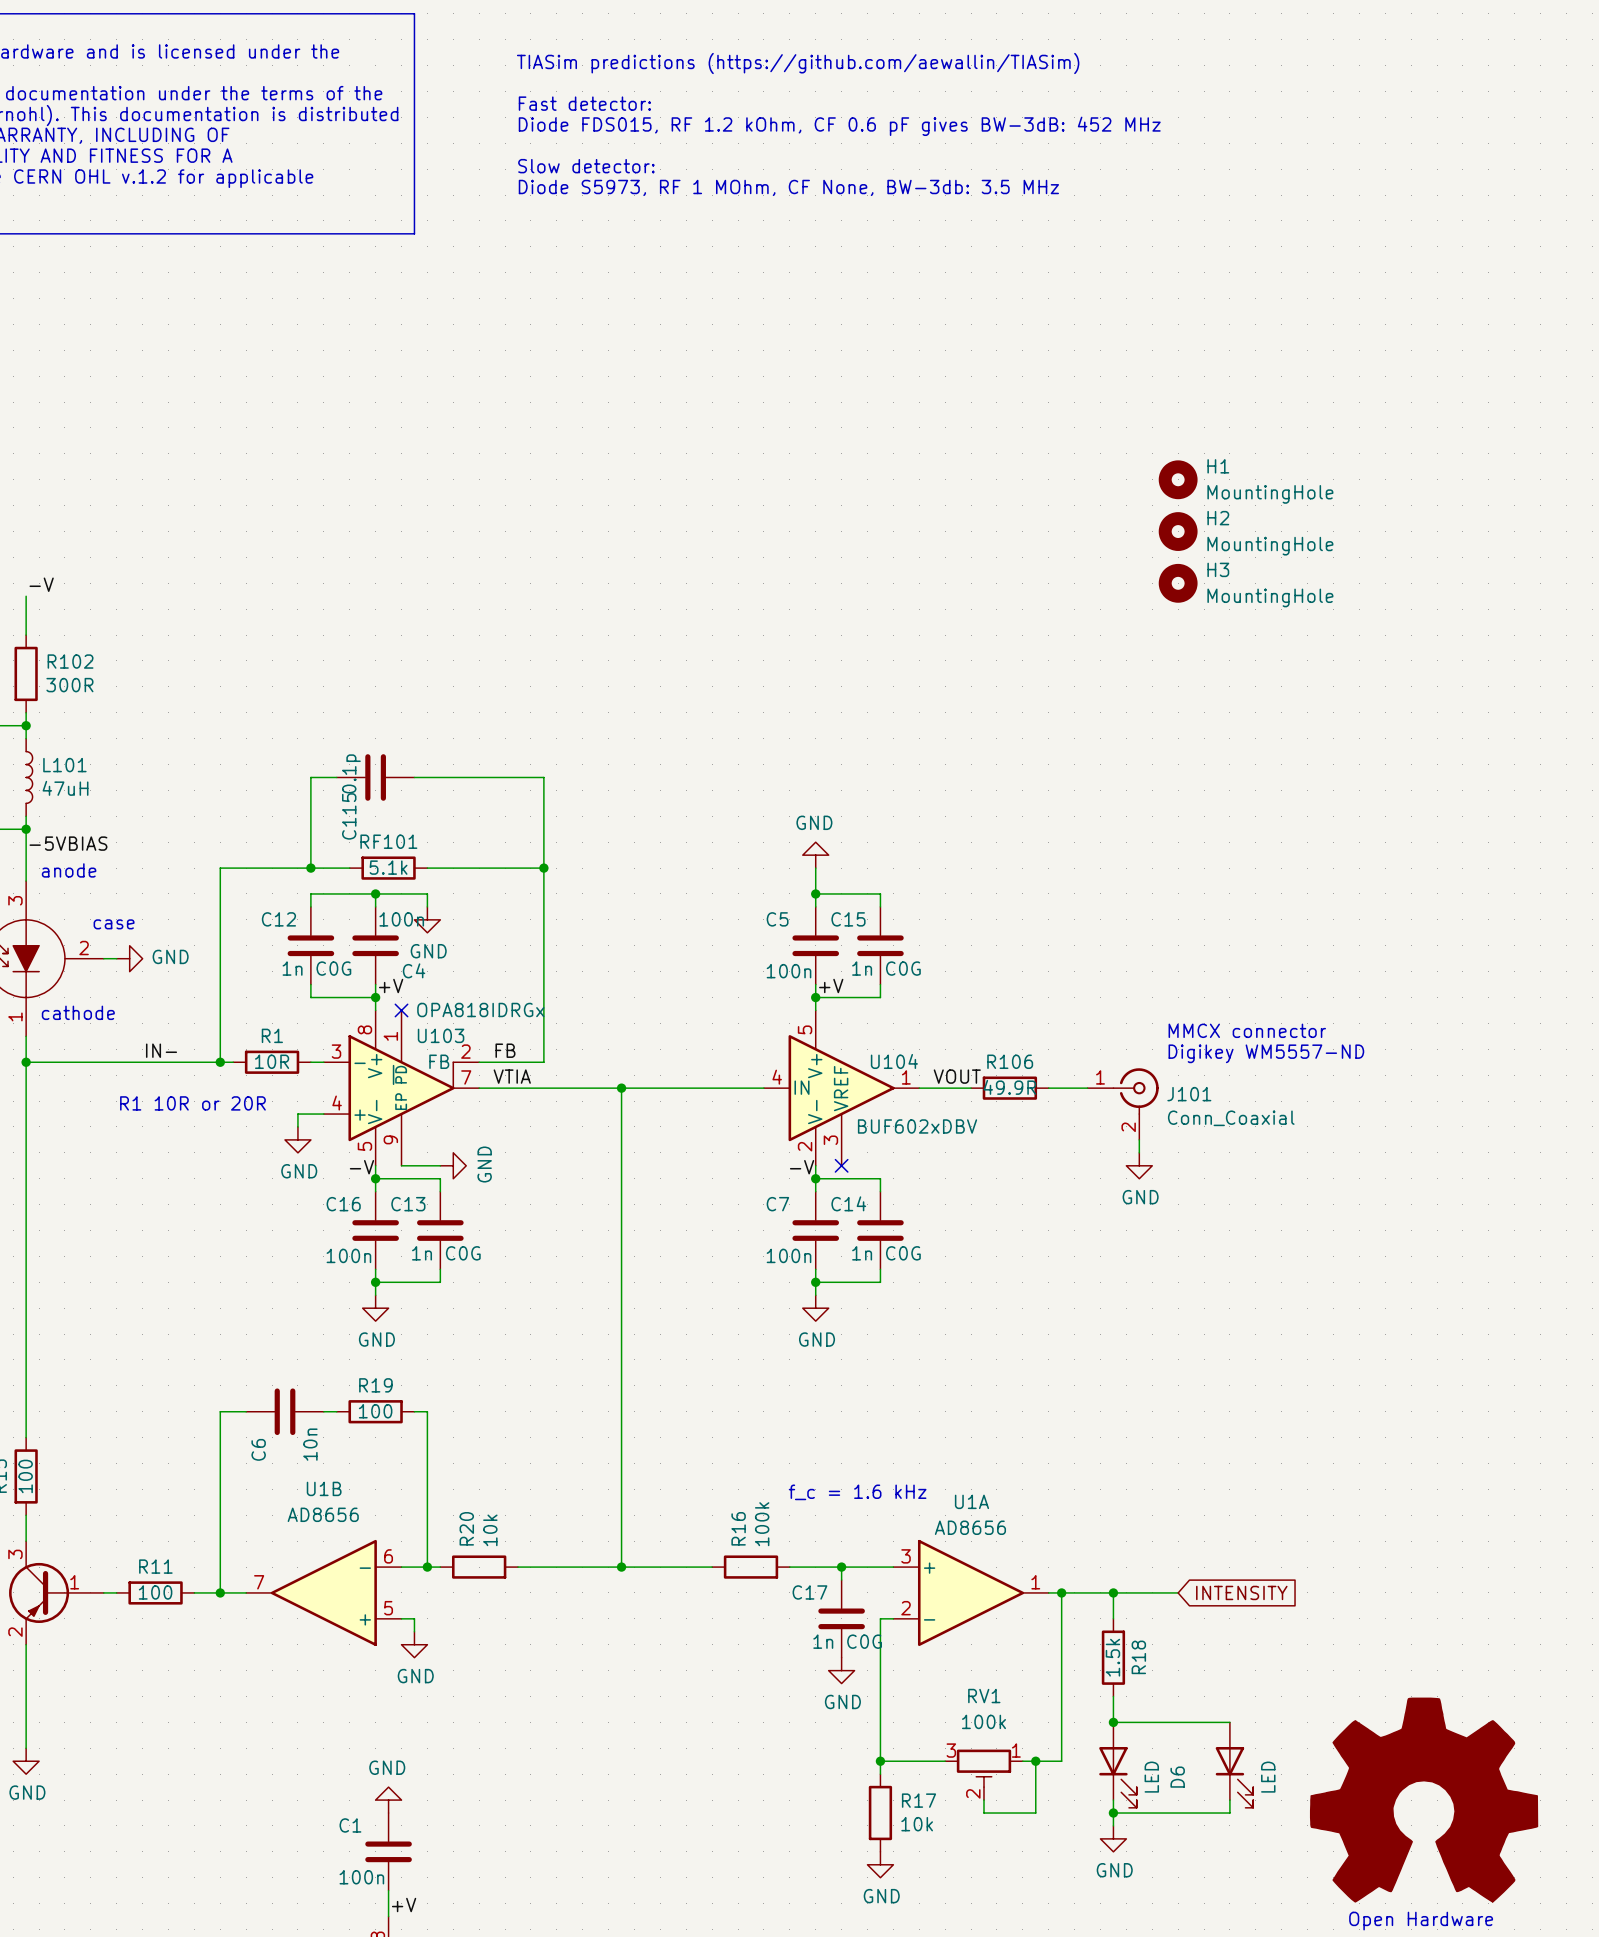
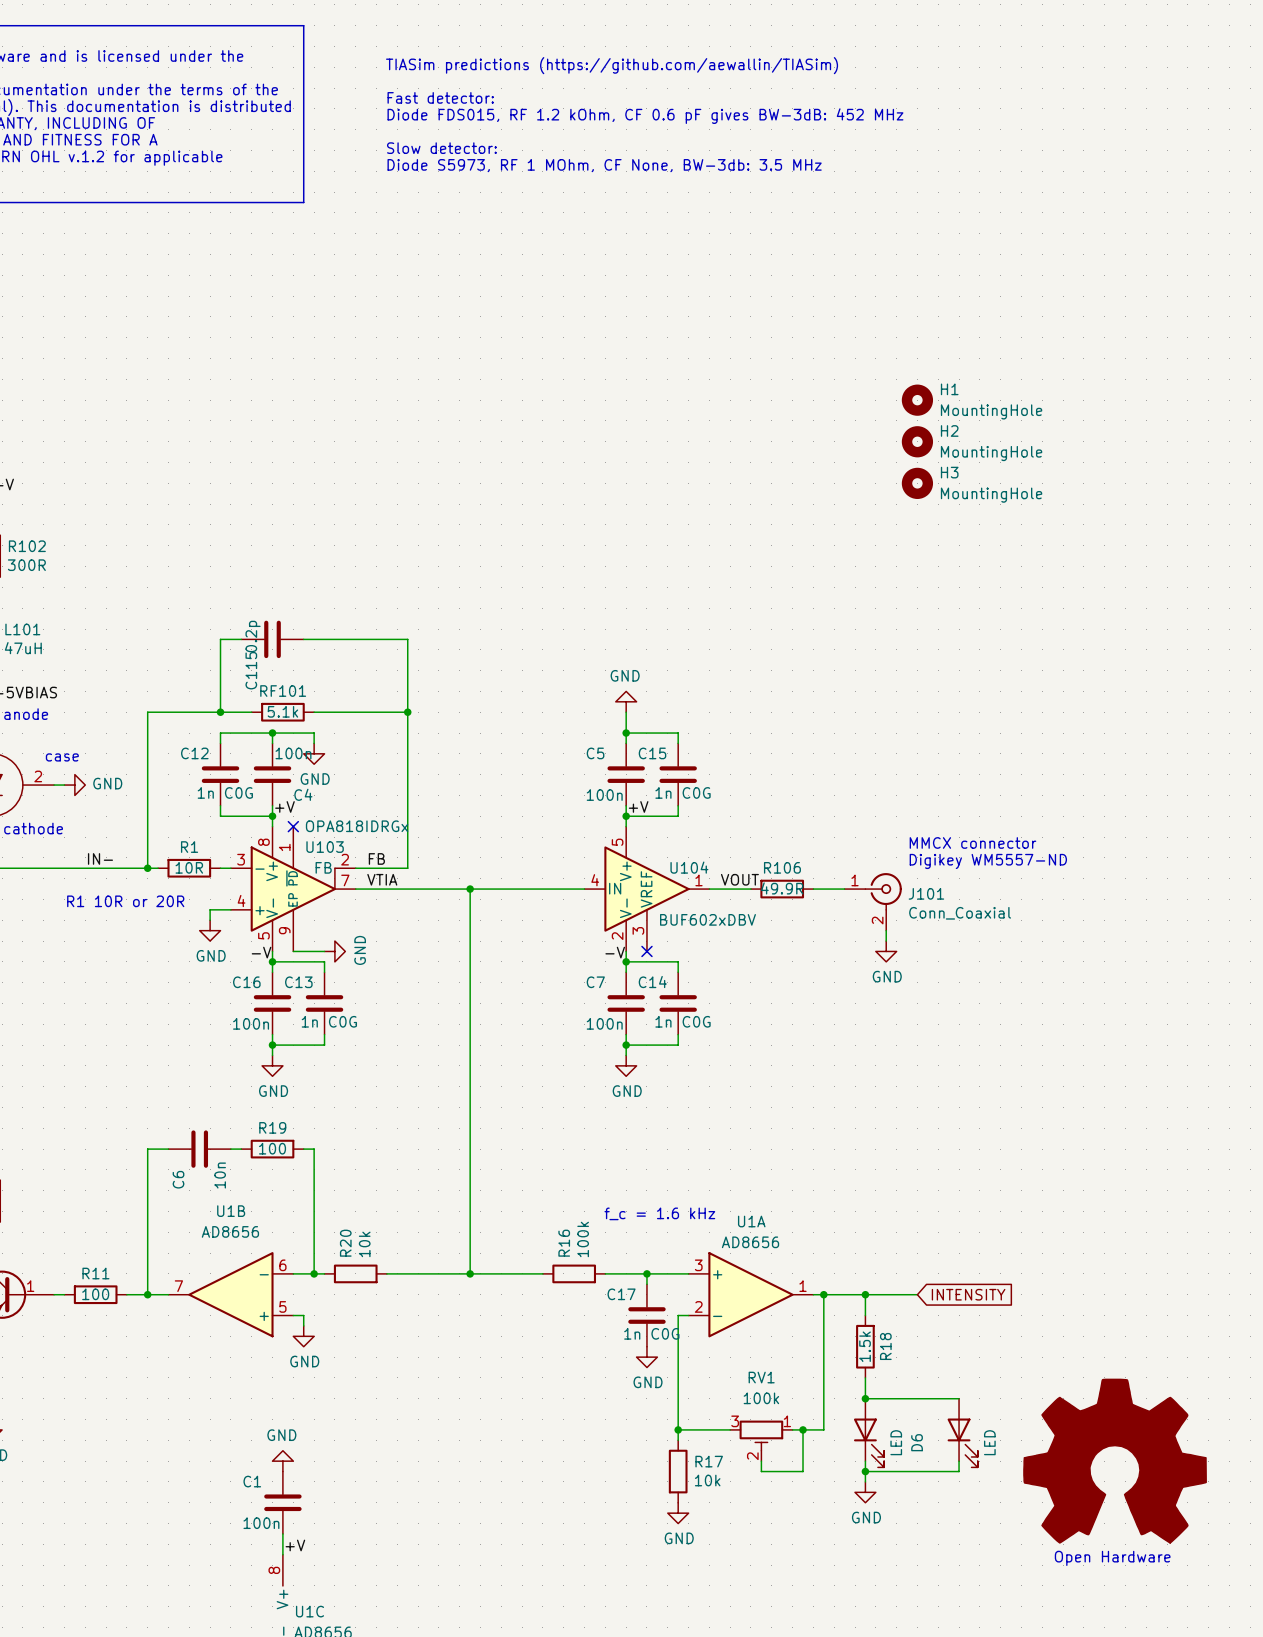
C115 value: 0.1p (351, 773) -> 0.2p (253, 636)

